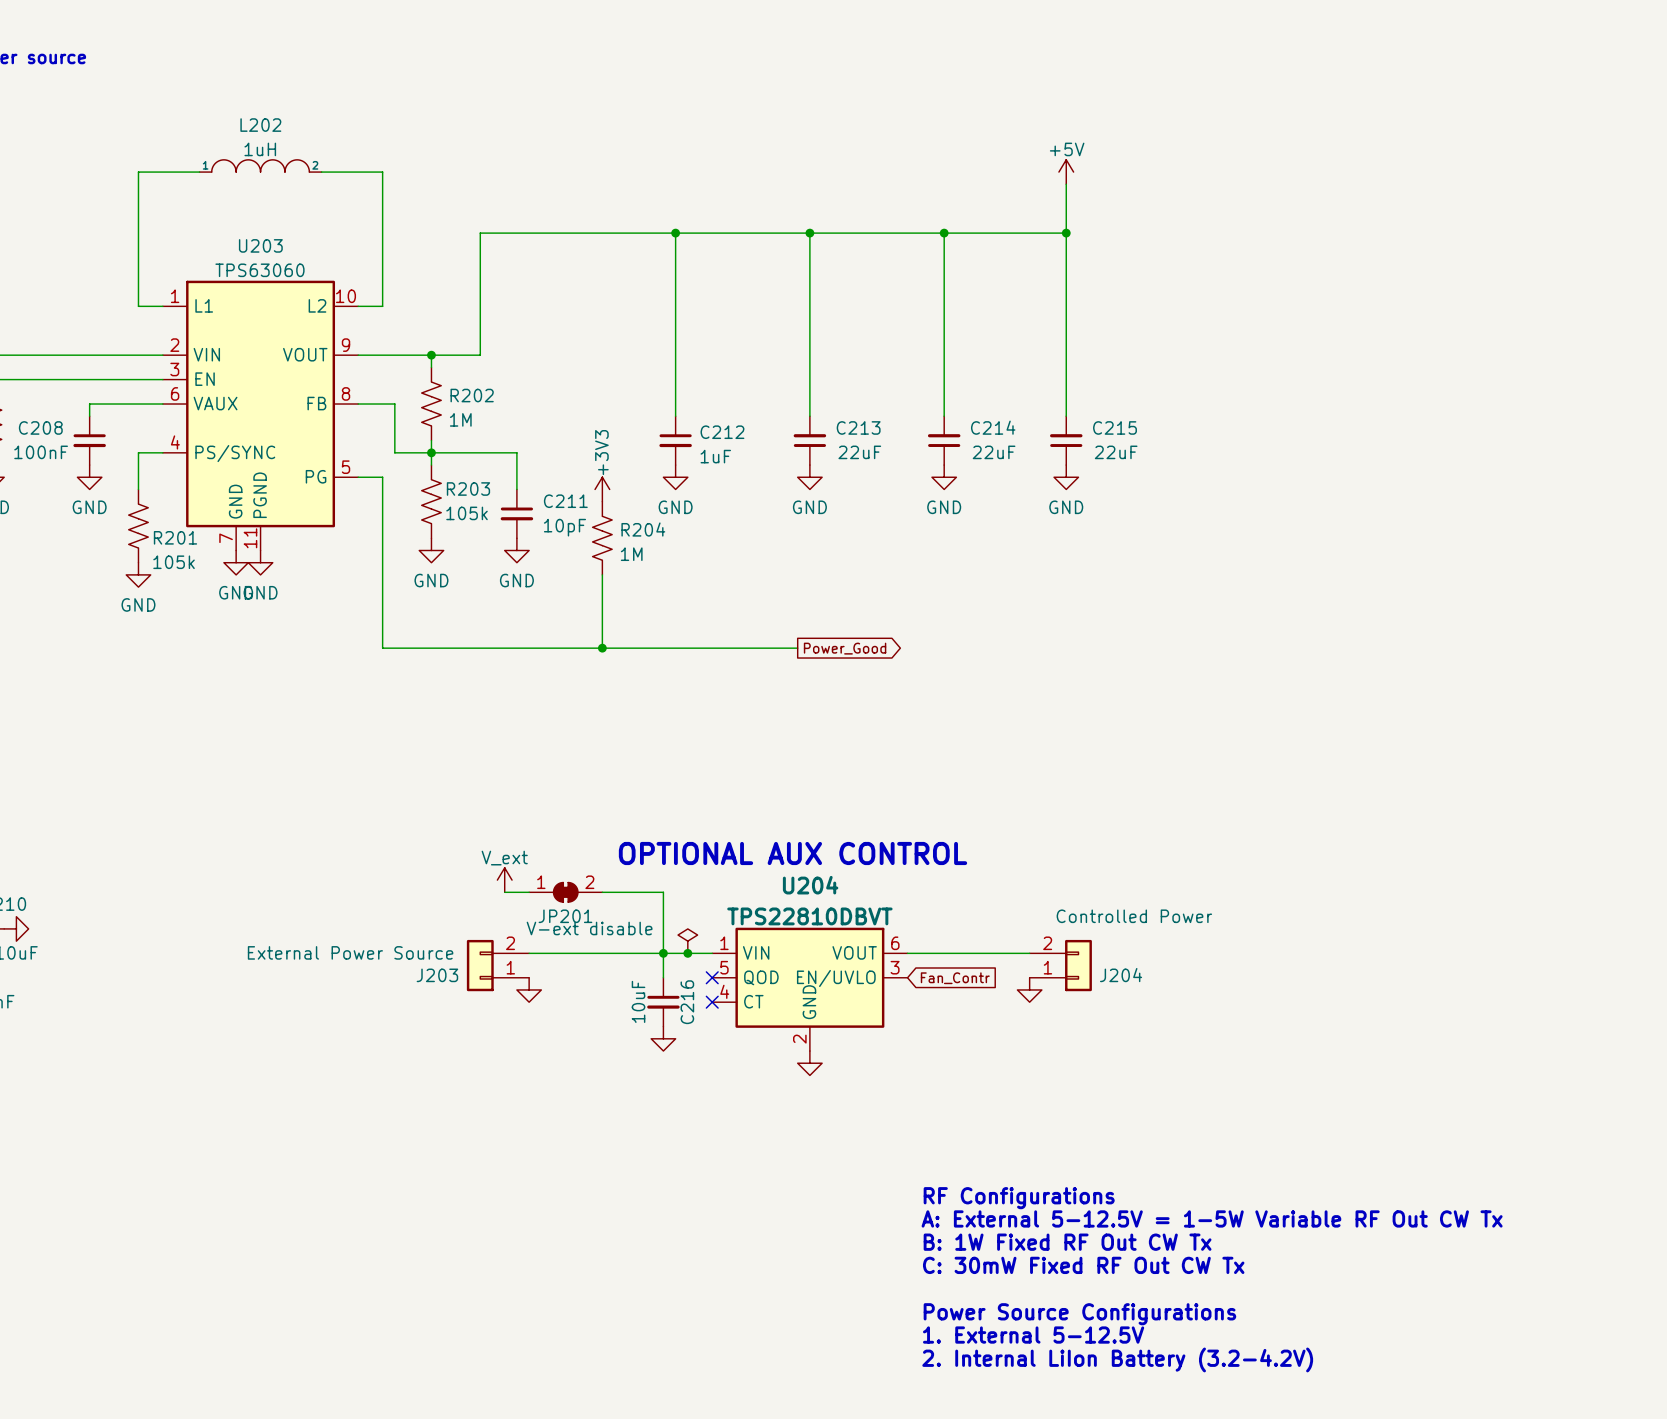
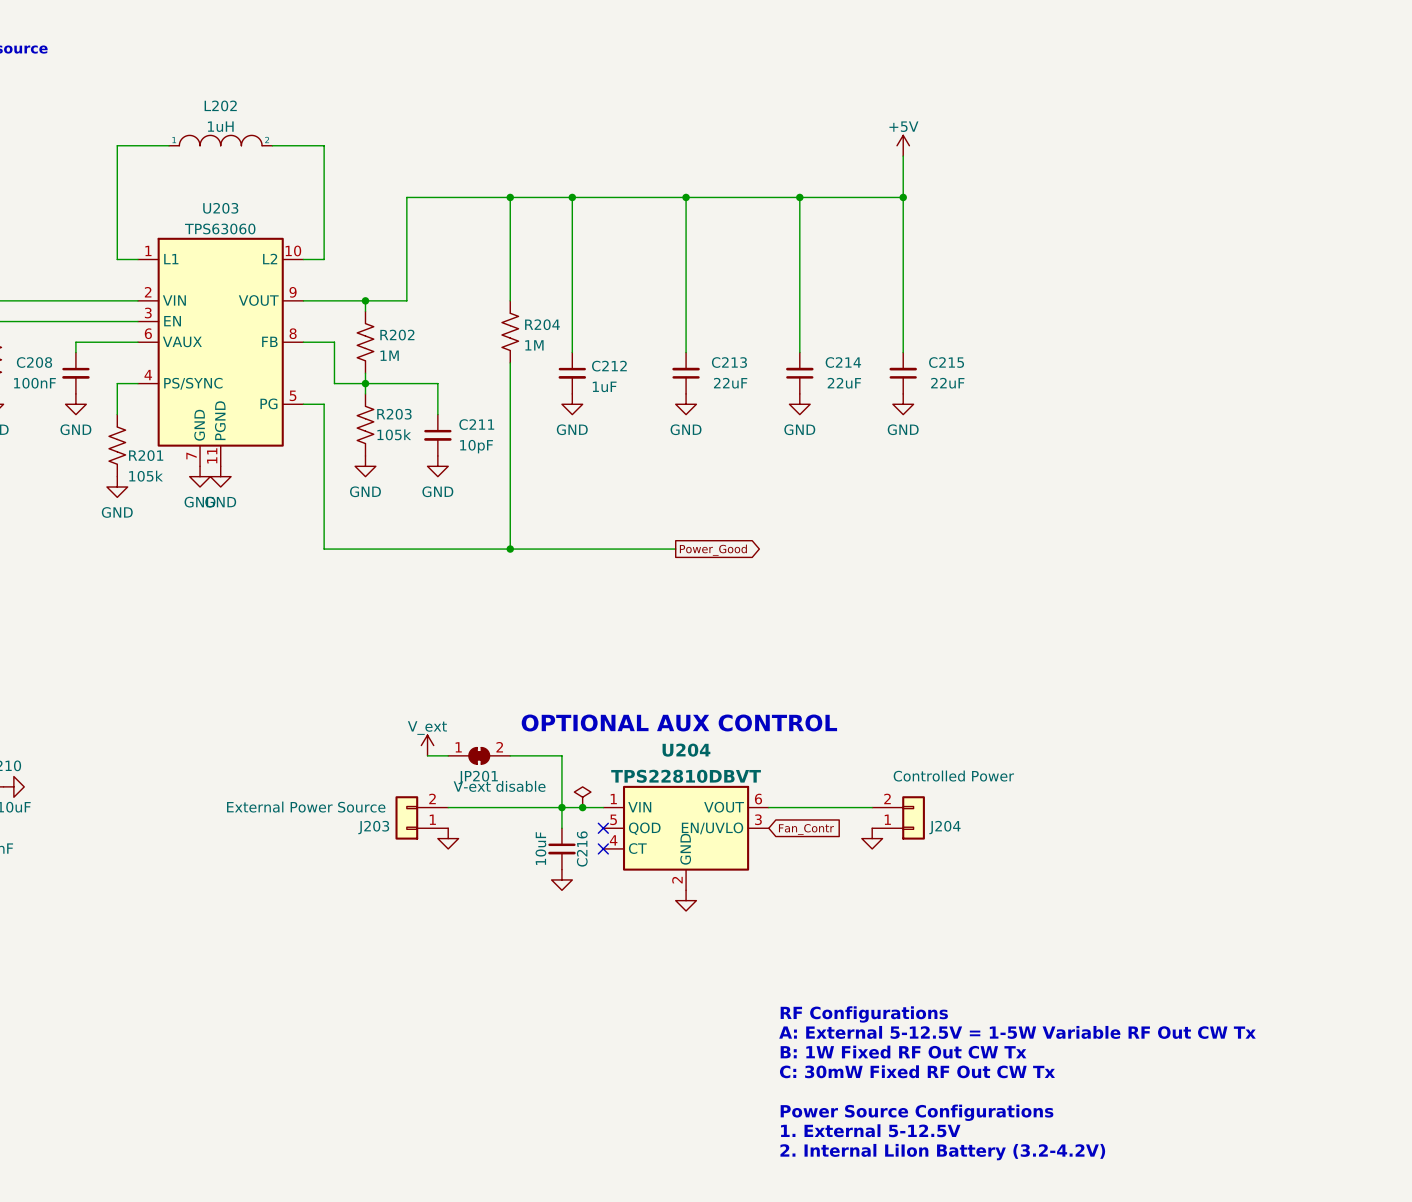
wire: none -> (510, 197) (510, 300)
junction: none -> (510, 197)
power symbol: +3V3 (602, 489) -> none
R204 position: (602, 538) -> (510, 331)

